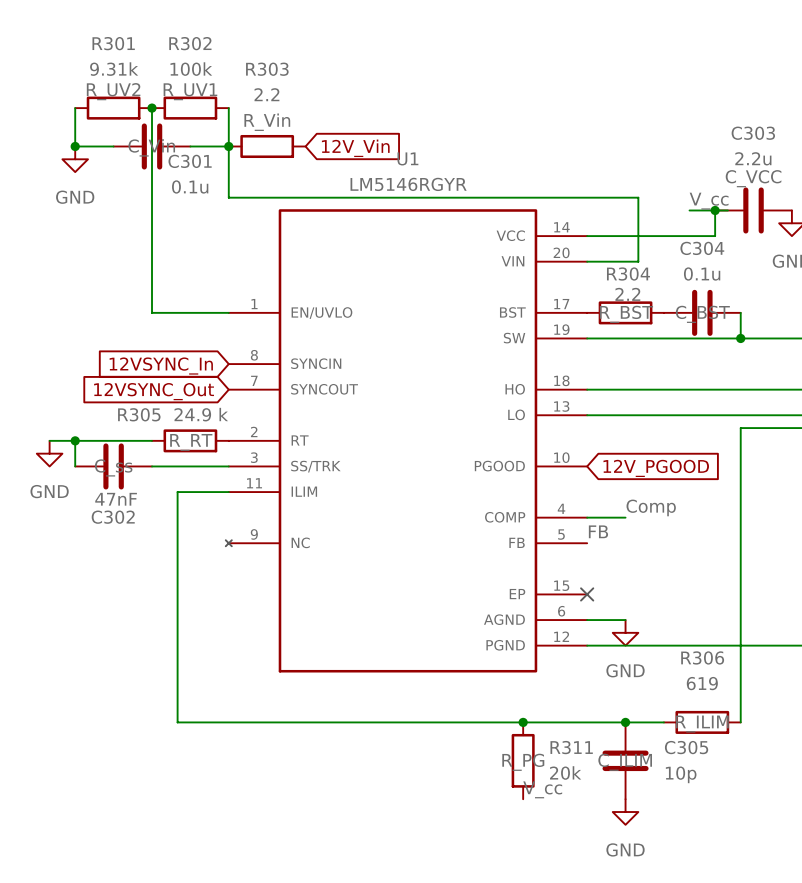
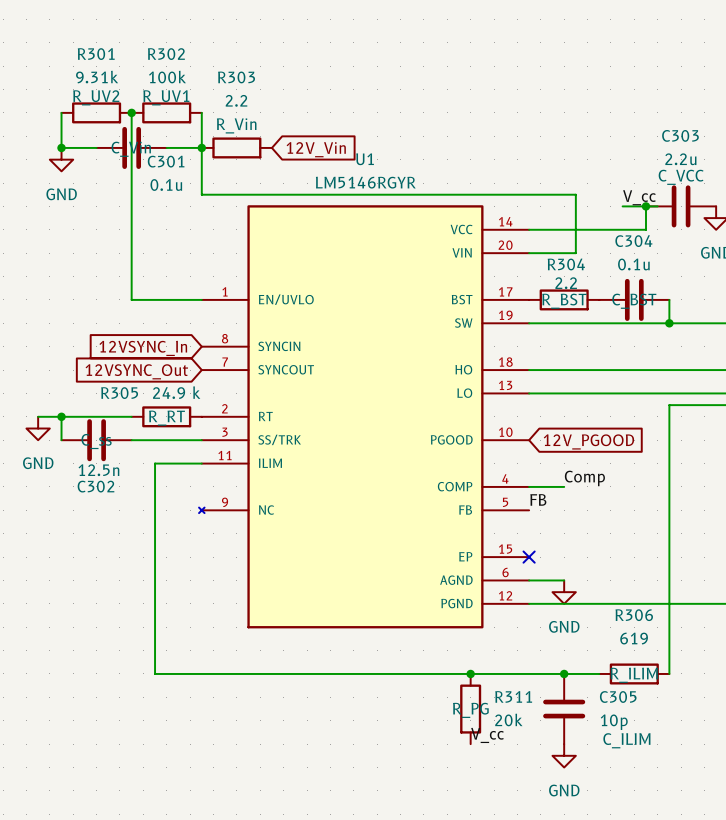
C302 value: 47nF (116, 499) -> 12.5n (98, 470)
C305 text position: C_ILIM (625, 762) -> C_ILIM (626, 740)

